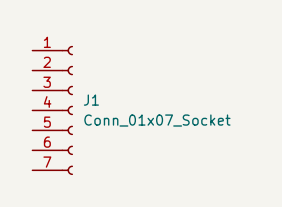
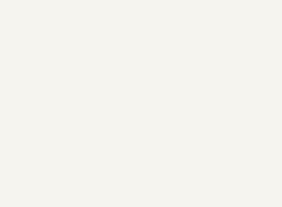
J1: Conn_01x07_Socket (52, 110) -> none

